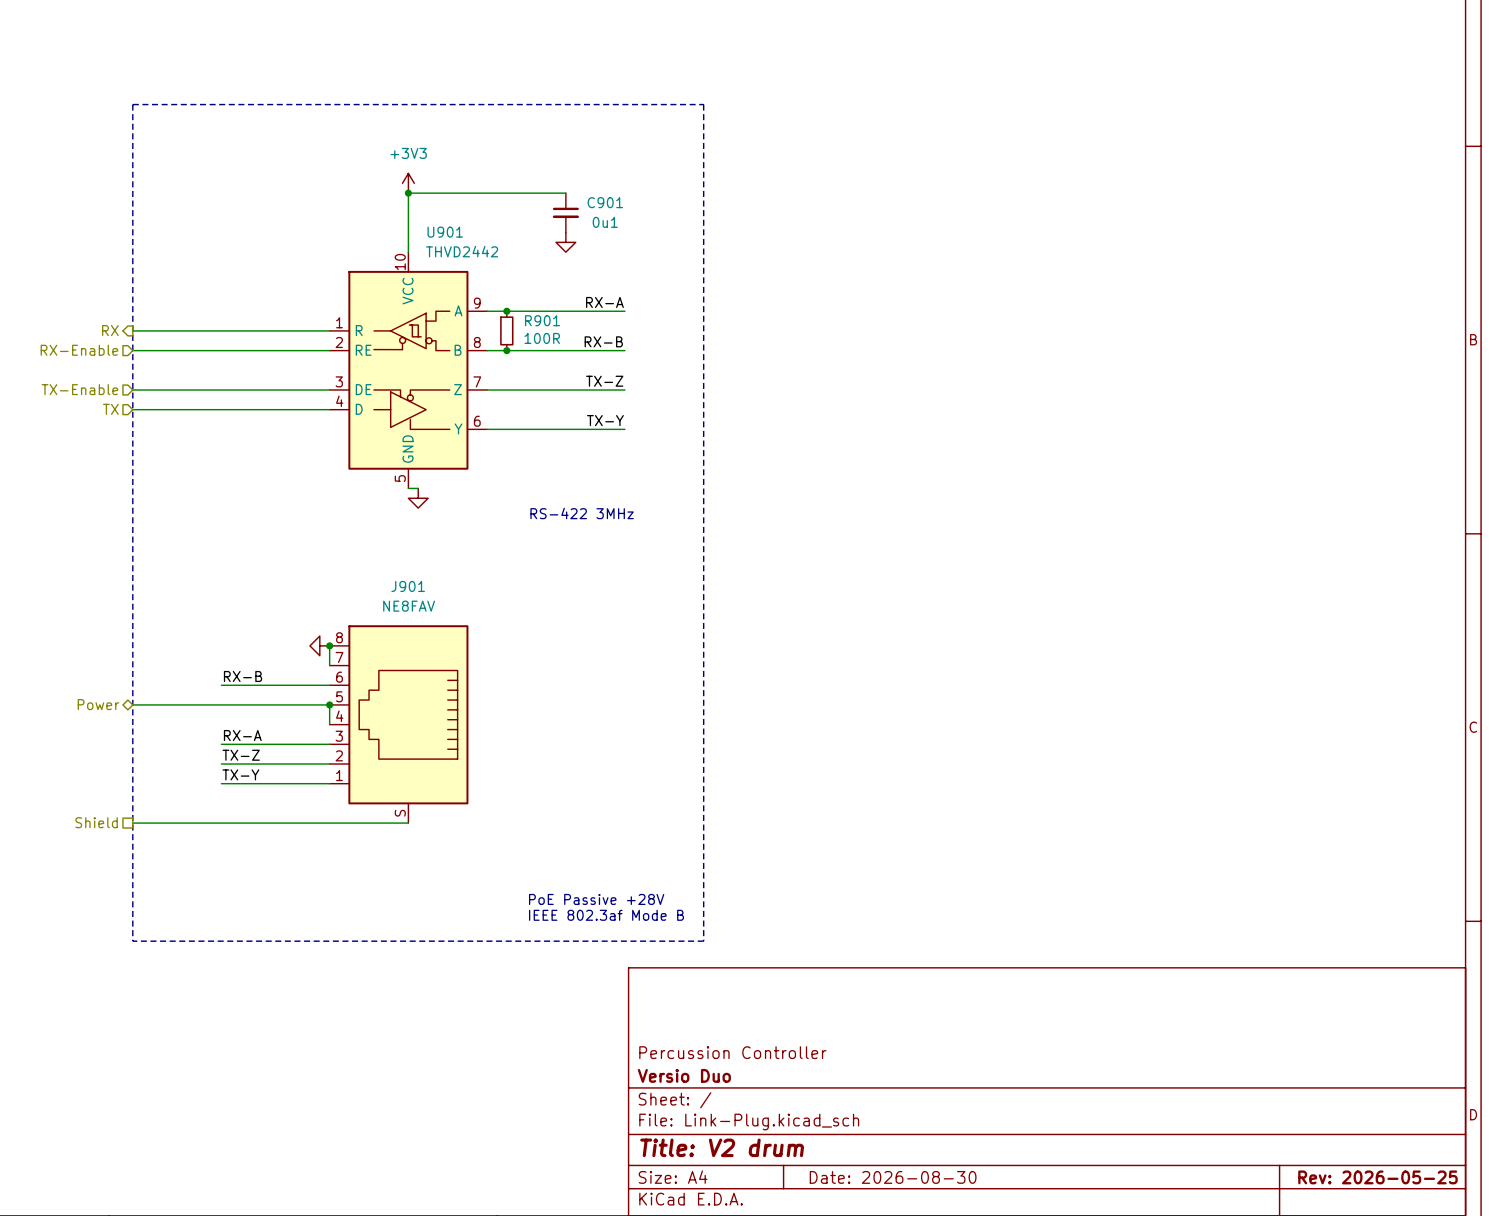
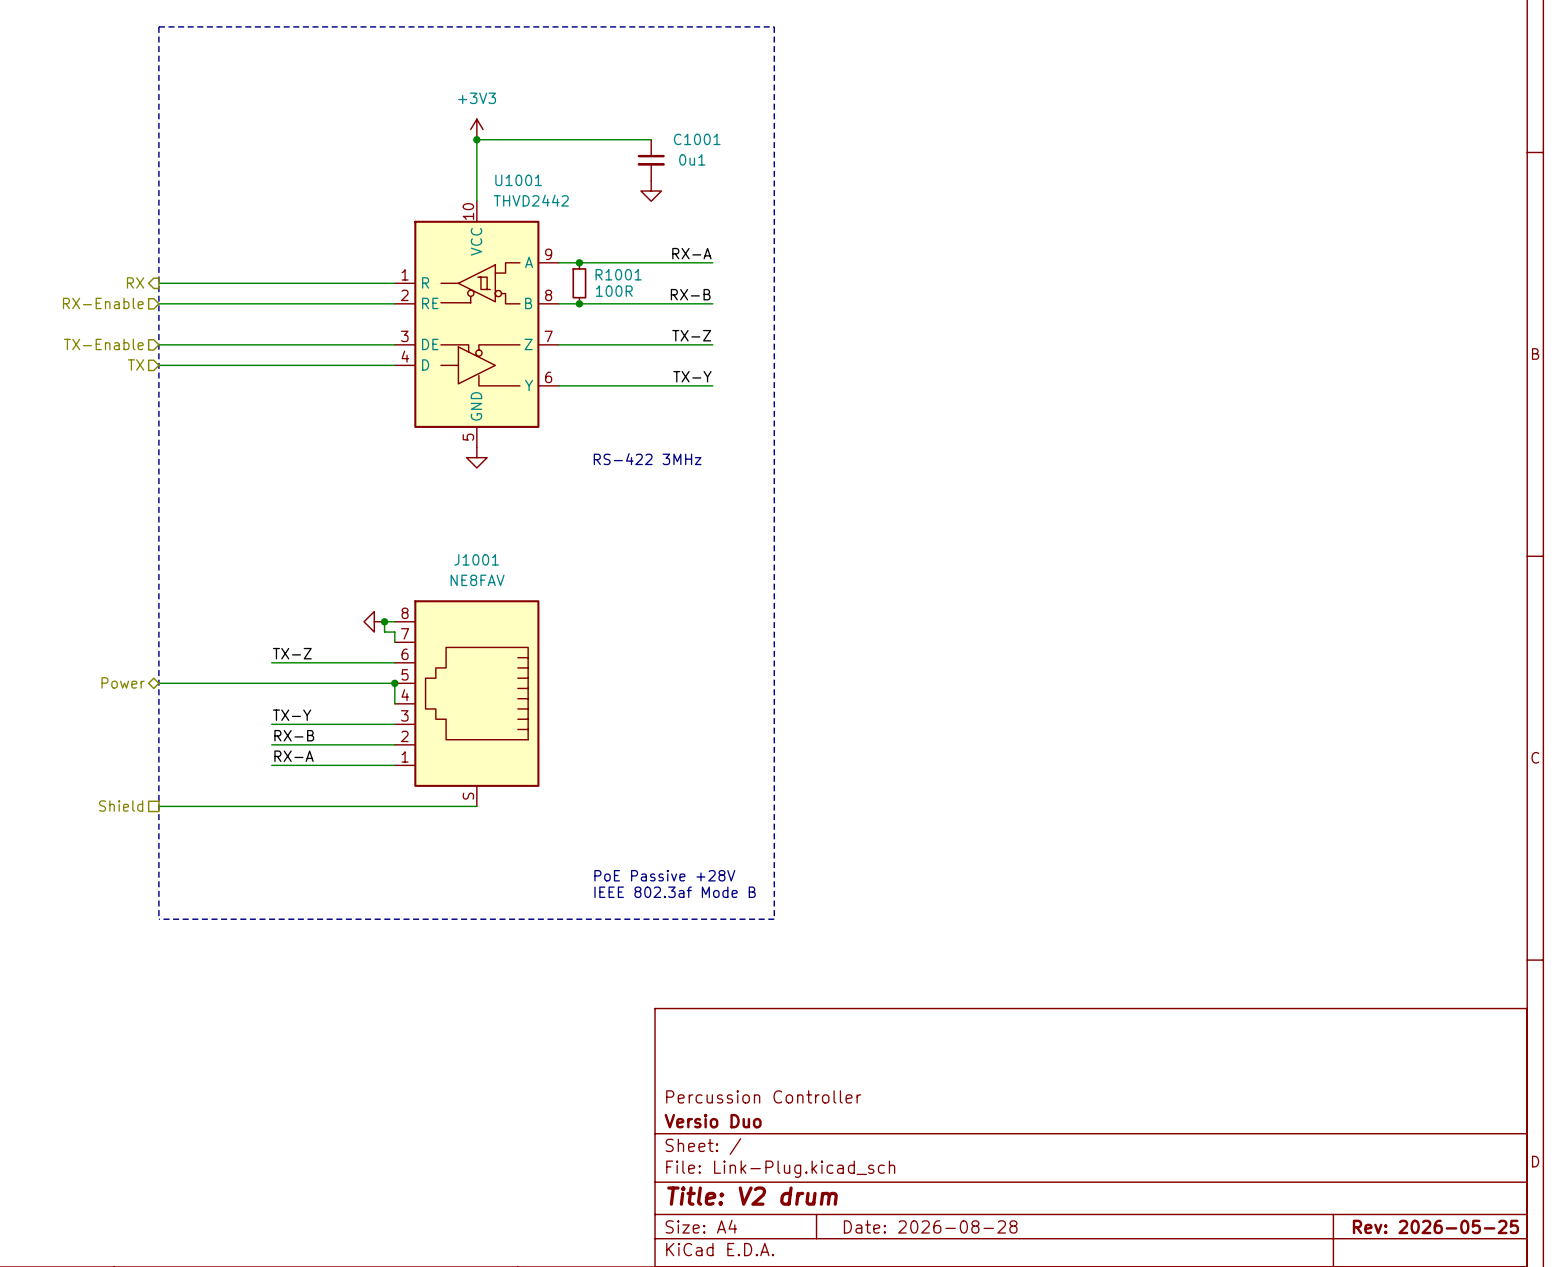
line: (132, 104) (132, 941) (703, 941) (703, 104) (132, 104) -> (158, 26) (158, 919) (774, 919) (774, 26) (158, 26)
junction: none -> (476, 139)
wire: none -> (651, 139) (476, 139) (476, 201)
C1001: none -> 0u1 (651, 160)
power symbol position: +3V3 (408, 183) -> +3V3 (476, 129)
junction: (408, 193) -> none
wire: (565, 193) (408, 193) (408, 252) -> none
C901: 0u1 (565, 212) -> none
power symbol position: (565, 242) -> (651, 191)
wire: none -> (558, 262) (712, 262)
junction: none -> (579, 262)
wire: none -> (158, 283) (394, 283)
R1001: none -> 100R (579, 283)
wire: none -> (158, 303) (394, 303)
wire: none -> (558, 303) (712, 303)
junction: none -> (579, 303)
label position: RX-A (604, 302) -> RX-A (691, 253)
U1001: none -> THVD2442 (476, 324)
wire: (487, 311) (624, 311) -> none
junction: (506, 311) -> none
hierarchical label position: RX (110, 330) -> RX (135, 282)
wire: (132, 330) (152, 330) -> none
R901: 100R (506, 330) -> none
wire: none -> (558, 344) (712, 344)
label position: RX-B (603, 341) -> RX-B (690, 294)
hierarchical label position: RX-Enable (79, 350) -> RX-Enable (103, 303)
wire: (132, 350) (152, 350) -> none
wire: (487, 350) (624, 350) -> none
junction: (506, 350) -> none
U901: THVD2442 (408, 370) -> none
wire: none -> (558, 385) (712, 385)
label position: TX-Z (604, 381) -> TX-Z (691, 335)
hierarchical label position: TX-Enable (79, 389) -> TX-Enable (103, 344)
wire: (132, 389) (329, 389) -> none
wire: (487, 389) (624, 389) -> none
hierarchical label position: TX (110, 409) -> TX (136, 364)
wire: (132, 409) (329, 409) -> none
label position: TX-Y (605, 420) -> TX-Y (692, 376)
wire: (487, 429) (624, 429) -> none
power symbol: none -> (476, 457)
wire: (408, 488) (418, 488) -> none
power symbol: (418, 498) -> none
text position: RS-422 3MHz (582, 513) -> RS-422 3MHz (647, 459)
power symbol: none -> (374, 621)
junction: none -> (384, 621)
wire: none -> (394, 621) (384, 621) (384, 632) (394, 632) (394, 642)
wire: none -> (271, 662) (394, 662)
power symbol: (319, 645) -> none
wire: (329, 645) (329, 665) -> none
junction: (329, 645) -> none
wire: none -> (158, 683) (394, 683) (394, 703)
junction: none -> (394, 683)
J1001: none -> NE8FAV (467, 703)
label position: RX-B (243, 676) -> RX-B (294, 735)
wire: (221, 685) (329, 685) -> none
wire: none -> (271, 724) (394, 724)
hierarchical label position: Power (98, 704) -> Power (123, 682)
wire: (132, 704) (329, 704) (329, 724) -> none
junction: (329, 704) -> none
wire: none -> (271, 744) (394, 744)
J901: NE8FAV (399, 724) -> none
wire: none -> (271, 765) (394, 765)
label position: RX-A (242, 735) -> RX-A (294, 756)
wire: (221, 744) (329, 744) -> none
label position: TX-Z (241, 755) -> TX-Z (292, 653)
wire: (221, 764) (329, 764) -> none
wire: none -> (158, 806) (476, 806)
label position: TX-Y (240, 774) -> TX-Y (292, 715)
wire: (221, 783) (329, 783) -> none
hierarchical label position: Shield (96, 822) -> Shield (121, 806)
wire: (132, 823) (408, 823) -> none
text position: PoE Passive +28V (596, 899) -> PoE Passive +28V (664, 875)
text position: IEEE 802.3af Mode B (606, 915) -> IEEE 802.3af Mode B (675, 892)
title block: Date: 2026-08-30 (893, 1177) -> Date: 2026-08-28 (930, 1226)

